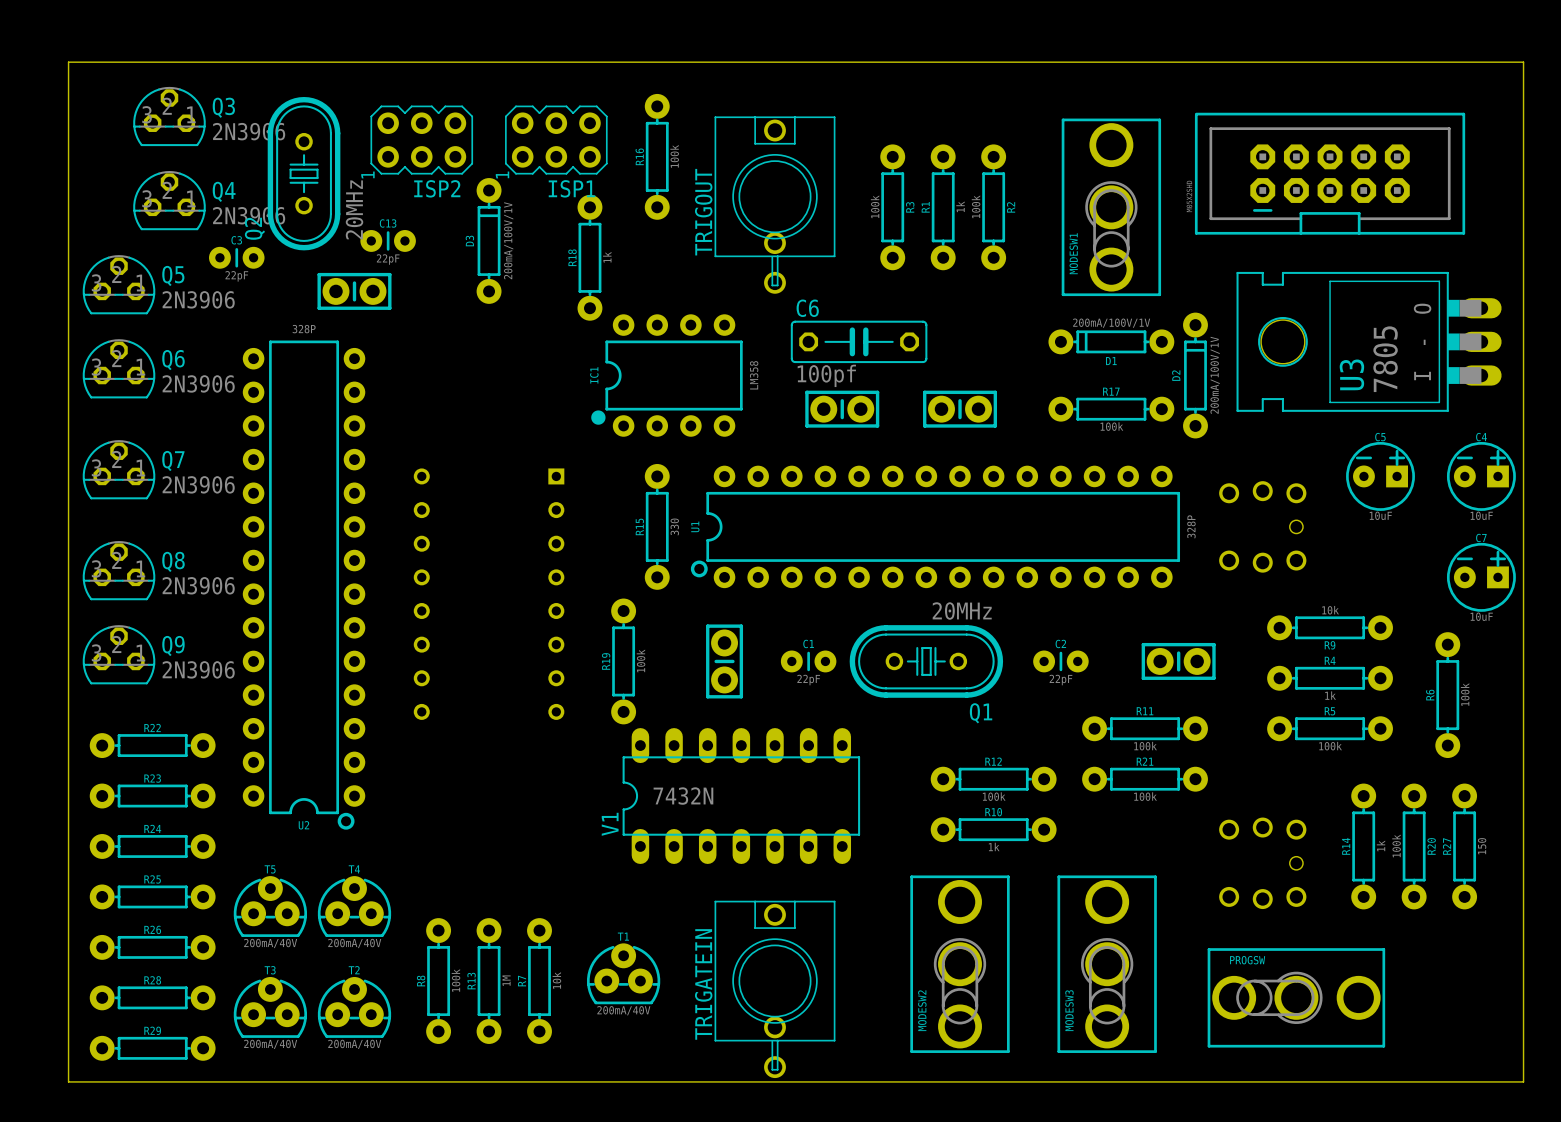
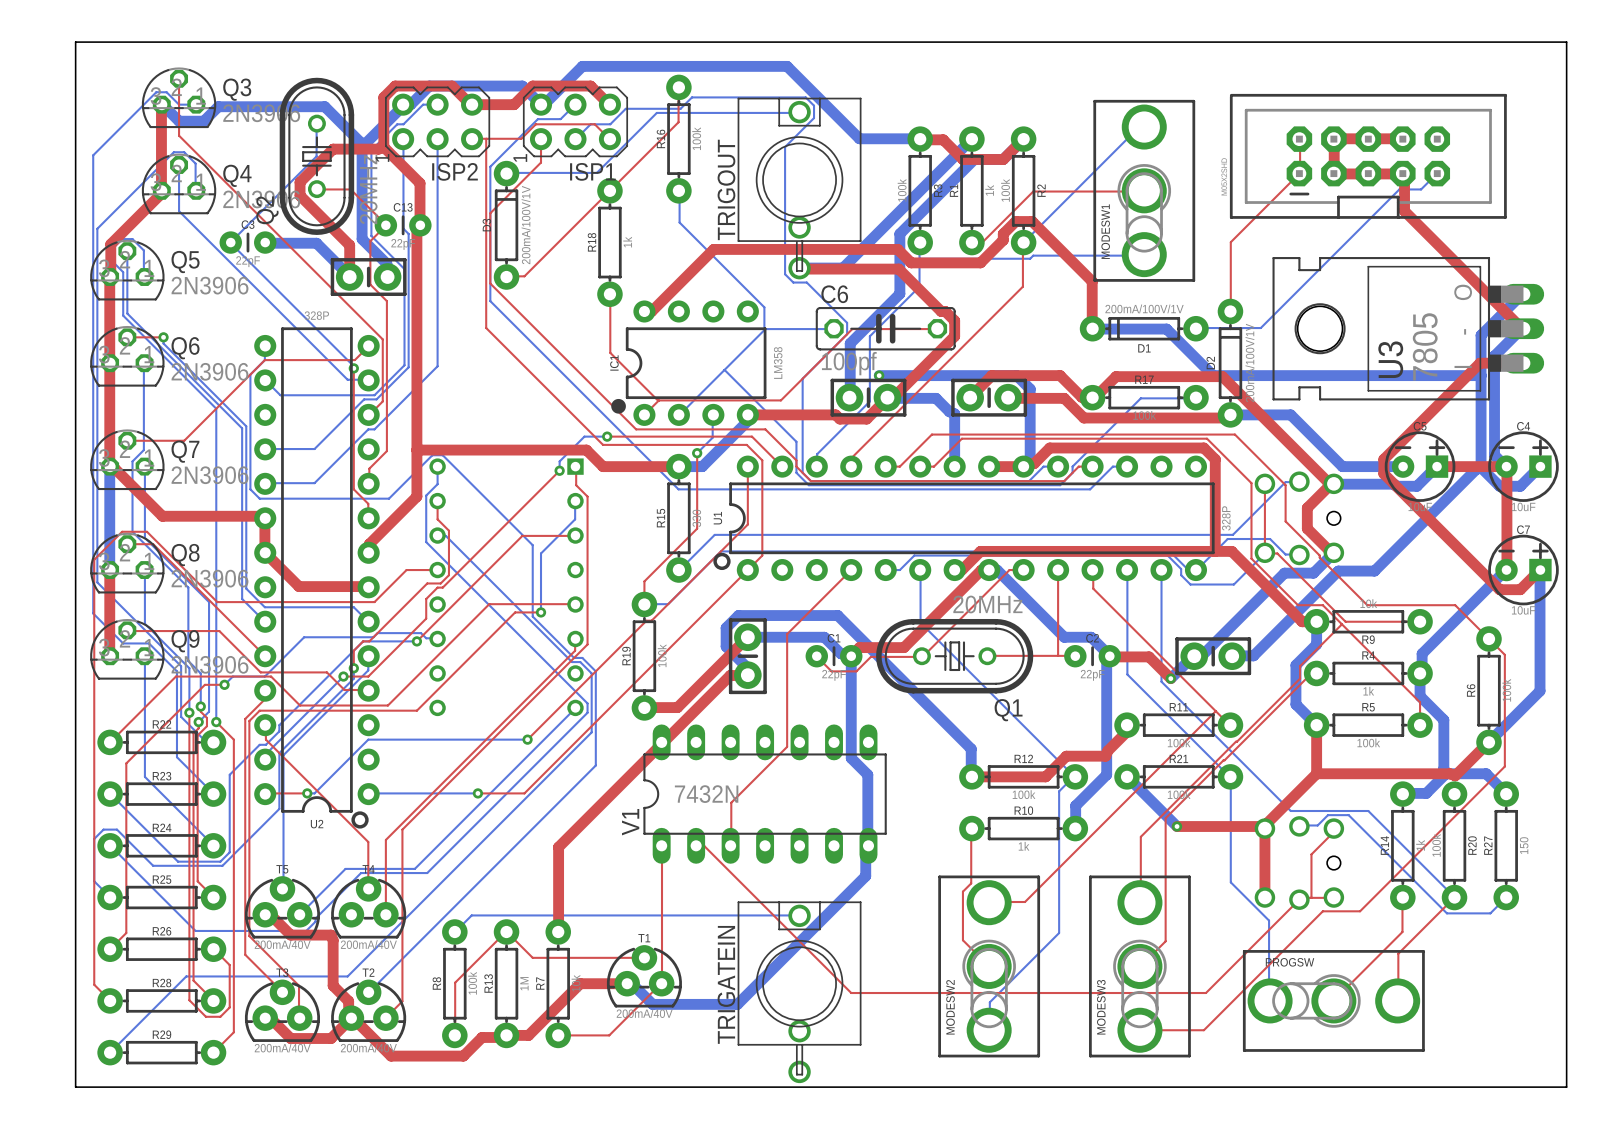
top track: none -> (179, 78) (179, 135) (382, 339) (382, 401) (368, 414)
top track: none -> (678, 87) (678, 122) (524, 276) (506, 277)
top track: none -> (161, 104) (161, 190) (159, 195) (110, 244) (109, 466) (114, 468) (162, 516) (259, 516) (265, 518) (265, 552) (299, 586) (368, 587)
bottom track: none -> (161, 104) (179, 121) (203, 121) (218, 106) (324, 106) (360, 141) (362, 147)
bottom track: none -> (196, 104) (179, 104) (166, 92) (156, 92) (93, 155) (93, 613) (123, 643) (149, 643) (176, 671) (176, 757) (213, 794)
bottom track: none -> (437, 104) (423, 104) (403, 124) (397, 124) (371, 150) (371, 235) (404, 269) (404, 365) (374, 395) (280, 395) (265, 380)
bottom track: none -> (575, 104) (560, 119) (537, 119) (490, 166) (490, 301) (678, 489) (1090, 489) (1112, 466) (1127, 466)
top track: none -> (609, 104) (590, 86) (532, 86) (514, 104) (472, 104) (452, 86) (395, 86) (383, 97) (383, 147)
bottom track: none -> (799, 112) (656, 112) (596, 172) (506, 173)
bottom track: none -> (316, 123) (316, 156) (230, 243) (353, 368)
bottom track: none -> (1144, 127) (1138, 127) (1023, 242)
bottom track: none -> (403, 139) (403, 228) (408, 233) (408, 367) (376, 399) (364, 399) (314, 449) (265, 449)
bottom track: none -> (437, 139) (437, 366) (374, 429) (368, 429) (314, 483) (265, 483)
top track: none -> (472, 139) (521, 138) (535, 124) (594, 124) (609, 139)
top track: none -> (486, 138) (486, 328) (603, 444) (746, 444) (762, 460) (762, 555) (524, 793) (477, 793)
top track: none -> (541, 139) (541, 162) (490, 213) (490, 283) (636, 429) (765, 429) (796, 460) (796, 466) (810, 481) (1064, 481) (1078, 466) (1092, 466)
bottom track: none -> (575, 139) (590, 124) (610, 124) (625, 108) (680, 108) (692, 97) (805, 97) (814, 105) (814, 118) (785, 147) (785, 274) (793, 282) (806, 282) (847, 322) (847, 334) (802, 378) (802, 472) (810, 481) (1029, 481) (1043, 466) (1058, 466)
top track: none -> (920, 139) (943, 139) (962, 159) (1003, 159) (1023, 139)
bottom track: none -> (920, 139) (859, 138) (787, 66) (582, 66) (546, 102) (541, 104) (522, 86) (429, 86) (410, 104) (403, 104) (362, 147)
bottom track: none -> (971, 139) (842, 268) (799, 268)
bottom track: none -> (1023, 139) (1003, 159) (974, 159) (899, 233) (899, 293) (850, 343) (849, 397)
top track: none -> (1299, 139) (1300, 172) (1230, 242) (1230, 311)
top track: none -> (1402, 139) (1333, 139) (1333, 173) (1402, 173) (1404, 211) (1523, 328)
bottom track: none -> (362, 147) (362, 239) (386, 263) (387, 277)
top track: none -> (383, 147) (420, 183) (420, 225) (416, 229) (416, 496) (369, 544) (368, 552)
top track: none -> (383, 147) (378, 149) (333, 149) (300, 182) (300, 195) (349, 245) (349, 277)
bottom track: none -> (179, 164) (179, 211) (347, 379) (368, 380)
bottom track: none -> (1437, 173) (1421, 189) (1399, 189) (1260, 328) (1195, 328)
top track: none -> (316, 189) (350, 189) (385, 224) (370, 241) (370, 284) (386, 301) (386, 451) (369, 468) (368, 483)
bottom track: none -> (196, 190) (195, 163) (184, 152) (173, 152) (97, 228) (97, 582) (181, 666) (181, 716) (205, 741) (213, 742)
bottom track: none -> (678, 190) (679, 222) (764, 307) (764, 329)
top track: none -> (1144, 190) (1033, 191) (982, 242) (971, 242)
bottom track: none -> (265, 242) (316, 243) (349, 277)
bottom track: none -> (920, 242) (919, 286) (869, 336) (869, 401) (817, 454) (816, 466)
top track: none -> (1023, 242) (1022, 286) (851, 458) (851, 466)
bottom track: none -> (127, 251) (127, 313) (242, 428) (242, 598) (265, 621)
bottom track: none -> (1144, 254) (1033, 255) (1030, 258) (919, 258)
top track: none -> (799, 268) (898, 269) (941, 311) (945, 311) (954, 320) (954, 336) (895, 395) (887, 397) (866, 419) (839, 419) (835, 414) (747, 414)
bottom track: none -> (144, 277) (143, 250) (132, 239) (122, 239) (114, 246) (114, 263) (123, 272) (123, 315) (216, 408) (216, 722)
top track: none -> (609, 294) (610, 352) (658, 400)
bottom track: none -> (1523, 294) (1481, 335) (1481, 467)
top track: none -> (644, 311) (651, 311) (713, 249) (897, 249) (911, 262) (980, 262) (1003, 240) (1003, 233) (1015, 221) (1032, 221) (1092, 281) (1092, 328)
bottom track: none -> (834, 328) (765, 329) (678, 414)
top track: none -> (937, 328) (852, 329) (780, 400) (658, 400) (644, 414)
bottom track: none -> (1092, 328) (1166, 329) (1213, 375) (1481, 375)
bottom track: none -> (1523, 328) (1494, 355) (1494, 455) (1506, 466)
top track: none -> (127, 337) (163, 337)
bottom track: none -> (163, 337) (163, 343) (246, 426) (246, 588) (264, 607) (353, 607) (368, 621)
via: none -> (163, 337)
bottom track: none -> (265, 345) (264, 360) (250, 374) (250, 489) (259, 498) (388, 498) (432, 455) (442, 455) (532, 545) (532, 616) (574, 657) (582, 657) (595, 671) (595, 765) (368, 992)
top track: none -> (368, 345) (354, 360) (264, 360) (184, 440) (127, 440)
bottom track: none -> (144, 363) (143, 450) (132, 461) (132, 531) (188, 587) (188, 661) (200, 673) (200, 706)
top track: none -> (1523, 363) (1480, 363) (1383, 459) (1383, 473) (1499, 589) (1520, 589) (1540, 570)
top track: none -> (353, 368) (353, 489) (368, 503) (368, 518)
via: none -> (353, 368)
bottom track: none -> (724, 369) (796, 441) (796, 472) (808, 485) (1060, 485) (1072, 472) (1072, 466) (1140, 398) (1195, 397)
bottom track: none -> (879, 375) (1016, 375) (1030, 389) (1030, 460) (1023, 466)
via: none -> (879, 375)
bottom track: none -> (887, 397) (936, 398) (949, 411) (954, 413) (954, 466)
top track: none -> (970, 397) (991, 375) (1060, 375) (1081, 397) (1092, 397) (1116, 376) (1222, 376) (1326, 481) (1333, 483) (1331, 484) (1307, 507) (1307, 528) (1331, 552) (1333, 552)
top track: none -> (1008, 397) (1064, 398) (1083, 418) (1226, 418) (1230, 414)
bottom track: none -> (713, 414) (712, 437) (697, 453)
bottom track: none -> (747, 414) (747, 421) (702, 466) (678, 466)
bottom track: none -> (1230, 414) (1290, 414) (1342, 466) (1403, 466)
top track: none -> (607, 436) (751, 436) (782, 466)
bottom track: none -> (607, 436) (584, 436) (559, 461) (559, 470)
via: none -> (607, 436)
top track: none -> (416, 450) (586, 450) (603, 466) (678, 466)
top track: none -> (697, 453) (697, 528) (644, 581) (644, 604)
via: none -> (697, 453)
bottom track: none -> (110, 466) (110, 570)
bottom track: none -> (144, 466) (144, 537) (209, 602) (209, 711) (198, 722)
bottom track: none -> (437, 466) (437, 484) (426, 495) (426, 542) (587, 703) (587, 712) (427, 873) (361, 873) (315, 918) (315, 921) (306, 930) (195, 930) (110, 845)
top track: none -> (575, 466) (576, 485) (587, 496) (587, 644) (402, 829) (402, 1001) (385, 1018)
top track: none -> (747, 466) (747, 524) (651, 620) (646, 620) (527, 739)
top track: none -> (885, 466) (899, 466) (931, 434) (1234, 434) (1285, 485) (1285, 521) (1367, 605) (1455, 605) (1504, 654) (1504, 766) (1360, 911) (1322, 911) (1203, 1030) (1139, 1030)
top track: none -> (920, 466) (933, 466) (961, 438) (1207, 438) (1251, 483) (1251, 558) (1298, 605) (1322, 605) (1420, 702) (1420, 725)
top track: none -> (989, 466) (1023, 466) (1028, 463) (1034, 463) (1049, 448) (1203, 448) (1215, 459) (1215, 551)
top track: none -> (1437, 466) (1506, 466) (1506, 570)
bottom track: none -> (1437, 466) (1416, 486) (1333, 483)
bottom track: none -> (1540, 466) (1520, 486) (1499, 486) (1481, 467)
bottom track: none -> (1481, 467) (1475, 469) (1374, 571) (1338, 571) (1253, 655) (1232, 656)
top track: none -> (559, 470) (442, 587) (437, 587) (426, 598) (426, 618) (368, 676) (343, 676)
via: none -> (559, 470)
bottom track: none -> (1299, 481) (1285, 482) (1232, 534) (714, 534) (678, 570)
top track: none -> (1264, 483) (1264, 553) (1277, 553) (1345, 621) (1420, 621)
top track: none -> (437, 501) (437, 519) (448, 530) (448, 575) (440, 583) (427, 583) (369, 641) (363, 641) (353, 650) (353, 668)
bottom track: none -> (575, 501) (575, 519) (541, 553) (541, 612)
bottom track: none -> (437, 535) (445, 535) (572, 662) (580, 662) (591, 673) (591, 732) (347, 976) (186, 976) (110, 1052)
top track: none -> (575, 535) (522, 535) (416, 641)
top track: none -> (127, 544) (153, 544) (265, 656)
bottom track: none -> (1264, 552) (1233, 584) (1190, 584) (1181, 575) (1181, 569) (1167, 555) (914, 555) (899, 570) (885, 570)
bottom track: none -> (1333, 552) (1313, 573) (1284, 573) (1201, 655) (1194, 655) (1170, 678)
bottom track: none -> (1299, 554) (1285, 554) (1270, 539) (1227, 539) (1196, 570) (1188, 570) (1169, 551) (720, 551) (668, 604) (644, 604)
top track: none -> (110, 570) (110, 656)
bottom track: none -> (144, 570) (144, 623) (189, 668) (189, 712)
top track: none -> (437, 570) (406, 570) (374, 602) (217, 602) (146, 531) (122, 531) (94, 559) (94, 984) (110, 1000)
top track: none -> (851, 570) (787, 634) (787, 746) (731, 802) (730, 845)
bottom track: none -> (920, 570) (920, 622) (1074, 776)
top track: none -> (954, 570) (961, 570) (980, 551) (1231, 551) (1302, 621) (1316, 621)
top track: none -> (989, 570) (981, 570) (904, 647) (859, 647) (851, 656)
bottom track: none -> (989, 570) (997, 570) (1064, 637) (1091, 637) (1109, 655) (1106, 660) (1106, 774) (1075, 805) (1075, 828)
top track: none -> (1023, 570) (1009, 570) (922, 656) (870, 656) (856, 671) (831, 671) (816, 656)
top track: none -> (1058, 570) (1058, 655)
top track: none -> (1092, 570) (1093, 588) (1230, 725)
bottom track: none -> (1127, 570) (1127, 674) (1230, 776) (1230, 882) (1269, 920) (1270, 1000)
bottom track: none -> (1161, 570) (1161, 681) (1290, 810) (1368, 810) (1454, 897)
bottom track: none -> (1506, 570) (1422, 653) (1420, 696) (1443, 719) (1443, 768) (1445, 773)
bottom track: none -> (1540, 570) (1540, 691) (1489, 742)
top track: none -> (575, 604) (489, 604) (387, 705) (300, 705) (271, 676) (175, 676) (110, 742)
top track: none -> (541, 612) (515, 612) (416, 710) (259, 710) (249, 721) (249, 936) (299, 985) (299, 1018)
via: none -> (541, 612)
bottom track: none -> (1316, 621) (1316, 644) (1295, 665) (1295, 704) (1316, 725)
top track: none -> (1341, 624) (1300, 666) (1300, 678) (1140, 836) (1139, 902)
top track: none -> (127, 630) (219, 631) (260, 672) (326, 672) (344, 690) (368, 690)
top track: none -> (747, 637) (677, 707) (644, 707)
bottom track: none -> (747, 637) (824, 637) (840, 653) (851, 656) (851, 758) (867, 774) (868, 845) (865, 850) (865, 876) (737, 1004) (652, 1004) (632, 983) (627, 983)
bottom track: none -> (437, 638) (426, 638) (421, 633) (377, 633) (373, 637) (304, 637) (264, 676) (232, 676) (224, 684)
top track: none -> (575, 638) (575, 650) (385, 839) (385, 914)
bottom track: none -> (416, 641) (363, 641) (279, 725) (279, 731) (265, 744) (259, 744) (229, 774) (229, 852) (220, 861) (178, 861) (110, 794)
via: none -> (416, 641)
bottom track: none -> (144, 656) (144, 776) (213, 845)
bottom track: none -> (368, 656) (368, 670) (283, 755) (282, 888)
top track: none -> (987, 656) (1075, 656)
top track: none -> (1109, 656) (1149, 656) (1170, 678)
bottom track: none -> (353, 668) (353, 678) (279, 753) (279, 808) (222, 865) (153, 865) (117, 829) (103, 829) (94, 838) (94, 881) (110, 897)
via: none -> (353, 668)
top track: none -> (1316, 673) (1311, 673) (1165, 818) (1165, 941) (1139, 966)
top track: none -> (747, 675) (730, 675) (558, 847) (558, 931)
bottom track: none -> (747, 675) (747, 668) (726, 646) (726, 627) (738, 615) (837, 615) (971, 748) (971, 776)
bottom track: none -> (343, 676) (265, 754) (265, 759)
via: none -> (343, 676)
via: none -> (1170, 678)
top track: none -> (224, 684) (204, 684) (126, 763) (126, 933) (110, 949)
via: none -> (224, 684)
top track: none -> (265, 690) (264, 699) (245, 718) (245, 954) (282, 992)
top track: none -> (200, 706) (200, 711) (206, 717) (206, 726) (197, 735) (197, 881) (213, 897)
via: none -> (200, 706)
bottom track: none -> (575, 707) (414, 868) (345, 868) (299, 914)
top track: none -> (1215, 711) (1025, 902) (989, 902)
top track: none -> (189, 712) (189, 1000) (205, 1016) (220, 1016) (229, 1007) (229, 965) (213, 949)
via: none -> (189, 712)
top track: none -> (198, 722) (198, 728) (193, 733) (193, 980) (213, 1000)
via: none -> (198, 722)
top track: none -> (216, 722) (233, 739) (233, 1032) (213, 1052)
via: none -> (216, 722)
top track: none -> (265, 725) (265, 739) (368, 842) (368, 888)
top track: none -> (1127, 725) (1126, 732) (1107, 751) (1105, 756) (1066, 756) (1045, 776) (971, 776)
top track: none -> (1316, 725) (1316, 773)
bottom track: none -> (527, 739) (368, 739) (314, 793) (307, 793)
via: none -> (527, 739)
top track: none -> (1489, 742) (1455, 775) (1450, 773) (1316, 773)
top track: none -> (1316, 773) (1266, 823) (1264, 828)
bottom track: none -> (1445, 773) (1426, 793) (1402, 794)
bottom track: none -> (1445, 773) (1486, 773) (1506, 794)
bottom track: none -> (1075, 776) (1059, 791) (1059, 933) (989, 1002) (989, 1030)
bottom track: none -> (1127, 776) (1177, 826)
top track: none -> (307, 793) (265, 794)
via: none -> (307, 793)
bottom track: none -> (477, 793) (368, 794)
via: none -> (477, 793)
top track: none -> (1177, 826) (1259, 826) (1264, 828)
via: none -> (1177, 826)
bottom track: none -> (1299, 826) (1317, 825) (1328, 815) (1348, 815) (1446, 913) (1490, 913) (1506, 897)
top track: none -> (971, 828) (971, 883) (962, 891) (962, 940) (989, 966)
top track: none -> (1264, 828) (1264, 897)
top track: none -> (1333, 828) (1333, 832) (1311, 854) (1311, 897)
top track: none -> (661, 845) (662, 983) (609, 1035) (558, 1035)
top track: none -> (696, 845) (704, 846) (851, 993) (1205, 993) (1301, 897) (1333, 897)
top track: none -> (1402, 897) (1402, 931) (1333, 1000)
top track: none -> (1454, 897) (1398, 953) (1397, 1000)
top track: none -> (265, 914) (271, 915) (290, 935) (331, 935) (333, 940) (333, 985) (348, 1001) (348, 1013) (351, 1018)
bottom track: none -> (799, 915) (471, 915) (454, 931)
top track: none -> (644, 957) (532, 957) (505, 931) (455, 982) (454, 1035)
top track: none -> (627, 983) (580, 983) (528, 1035) (482, 1037) (463, 1056) (391, 1056) (351, 1018)
top track: none -> (265, 1018) (271, 1018) (290, 1038) (331, 1038) (351, 1018)

